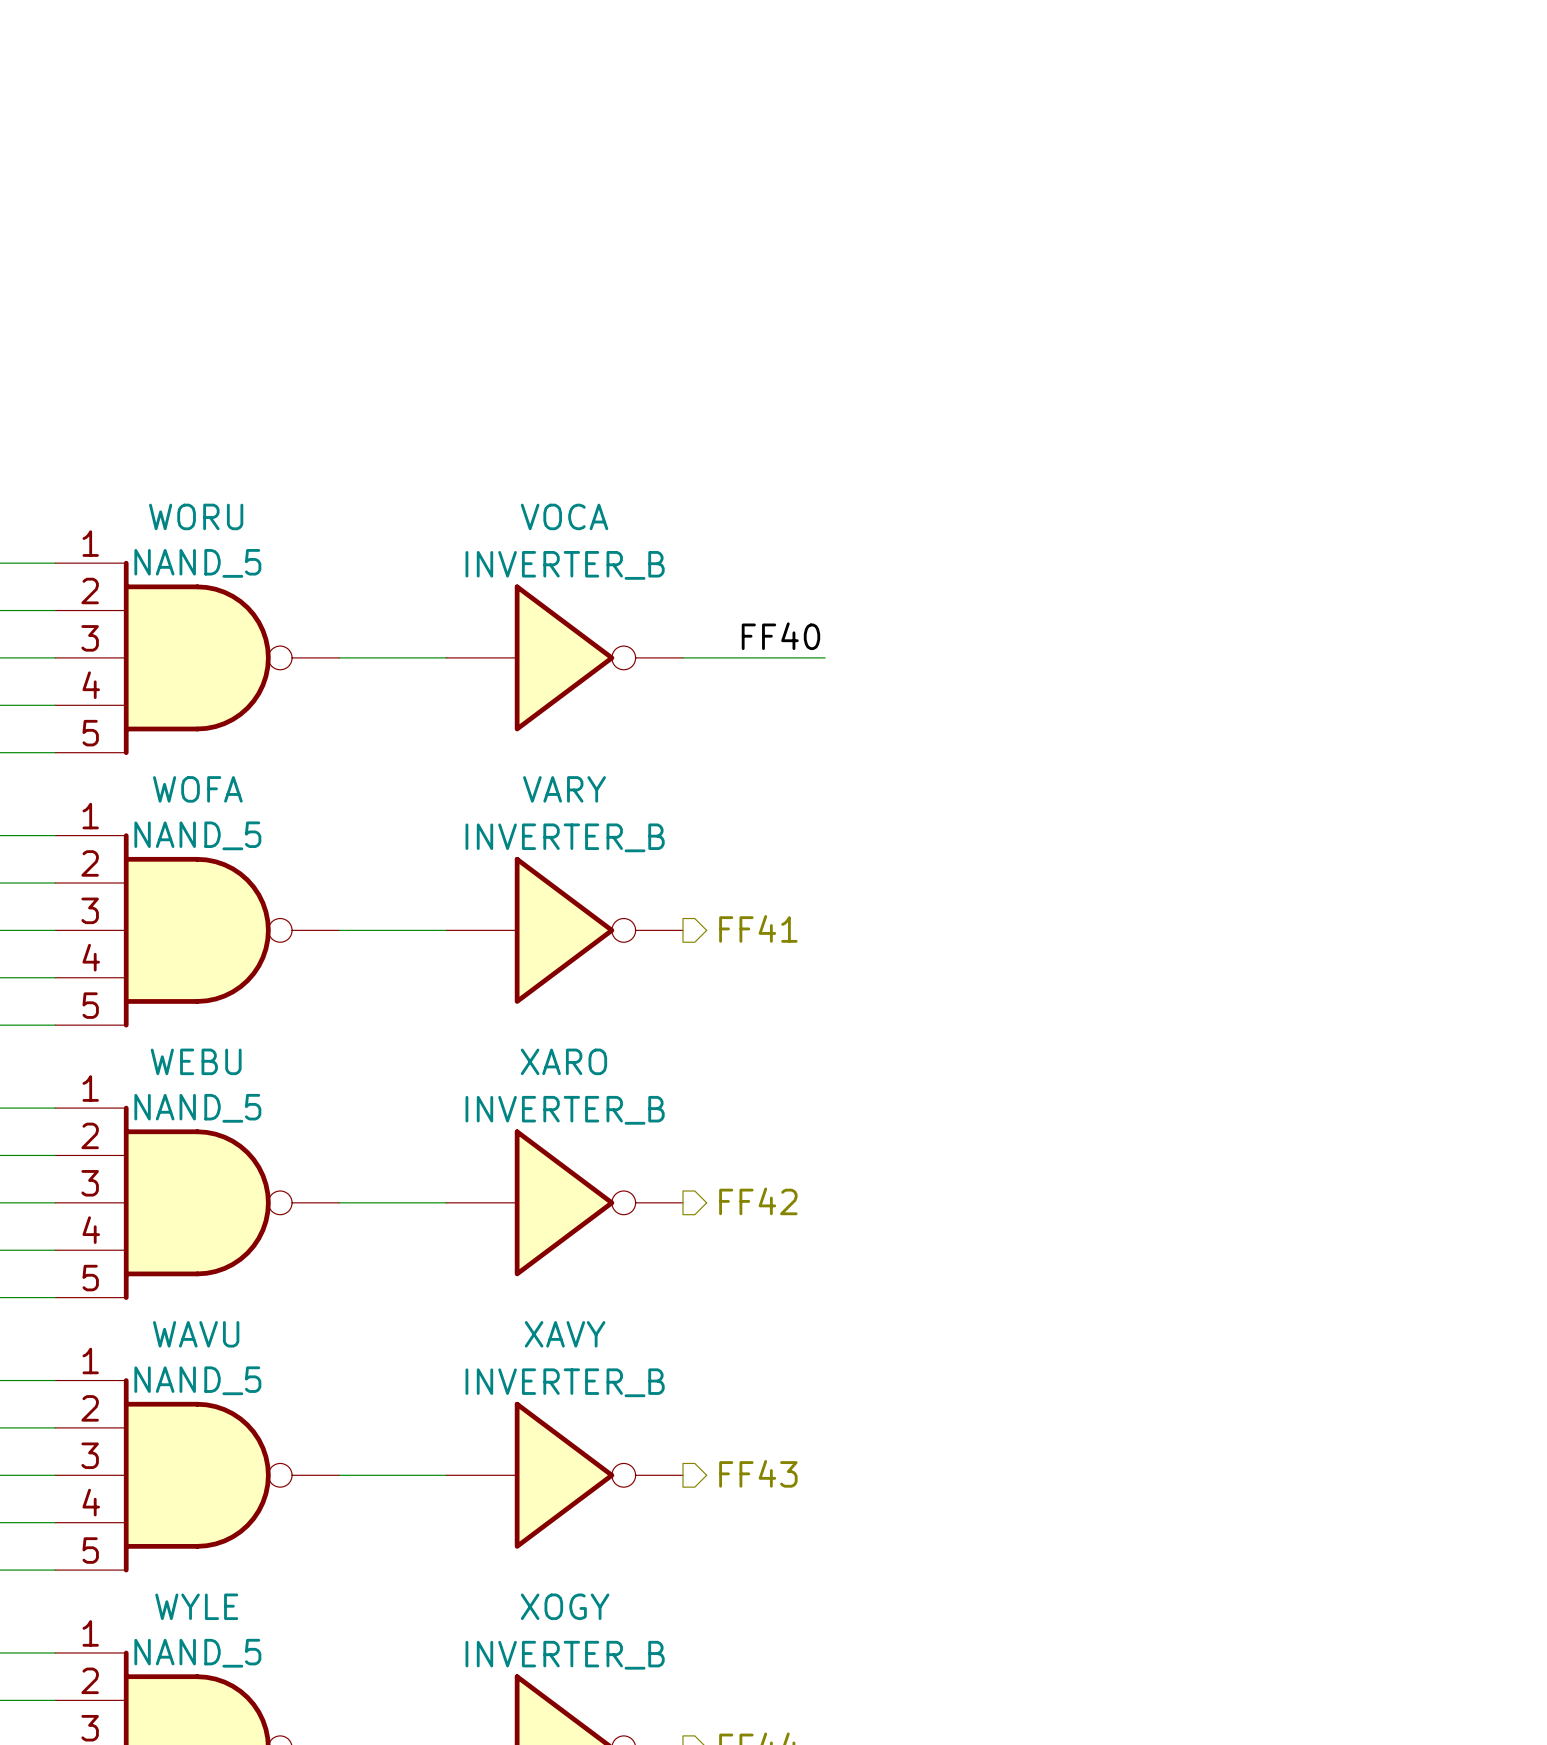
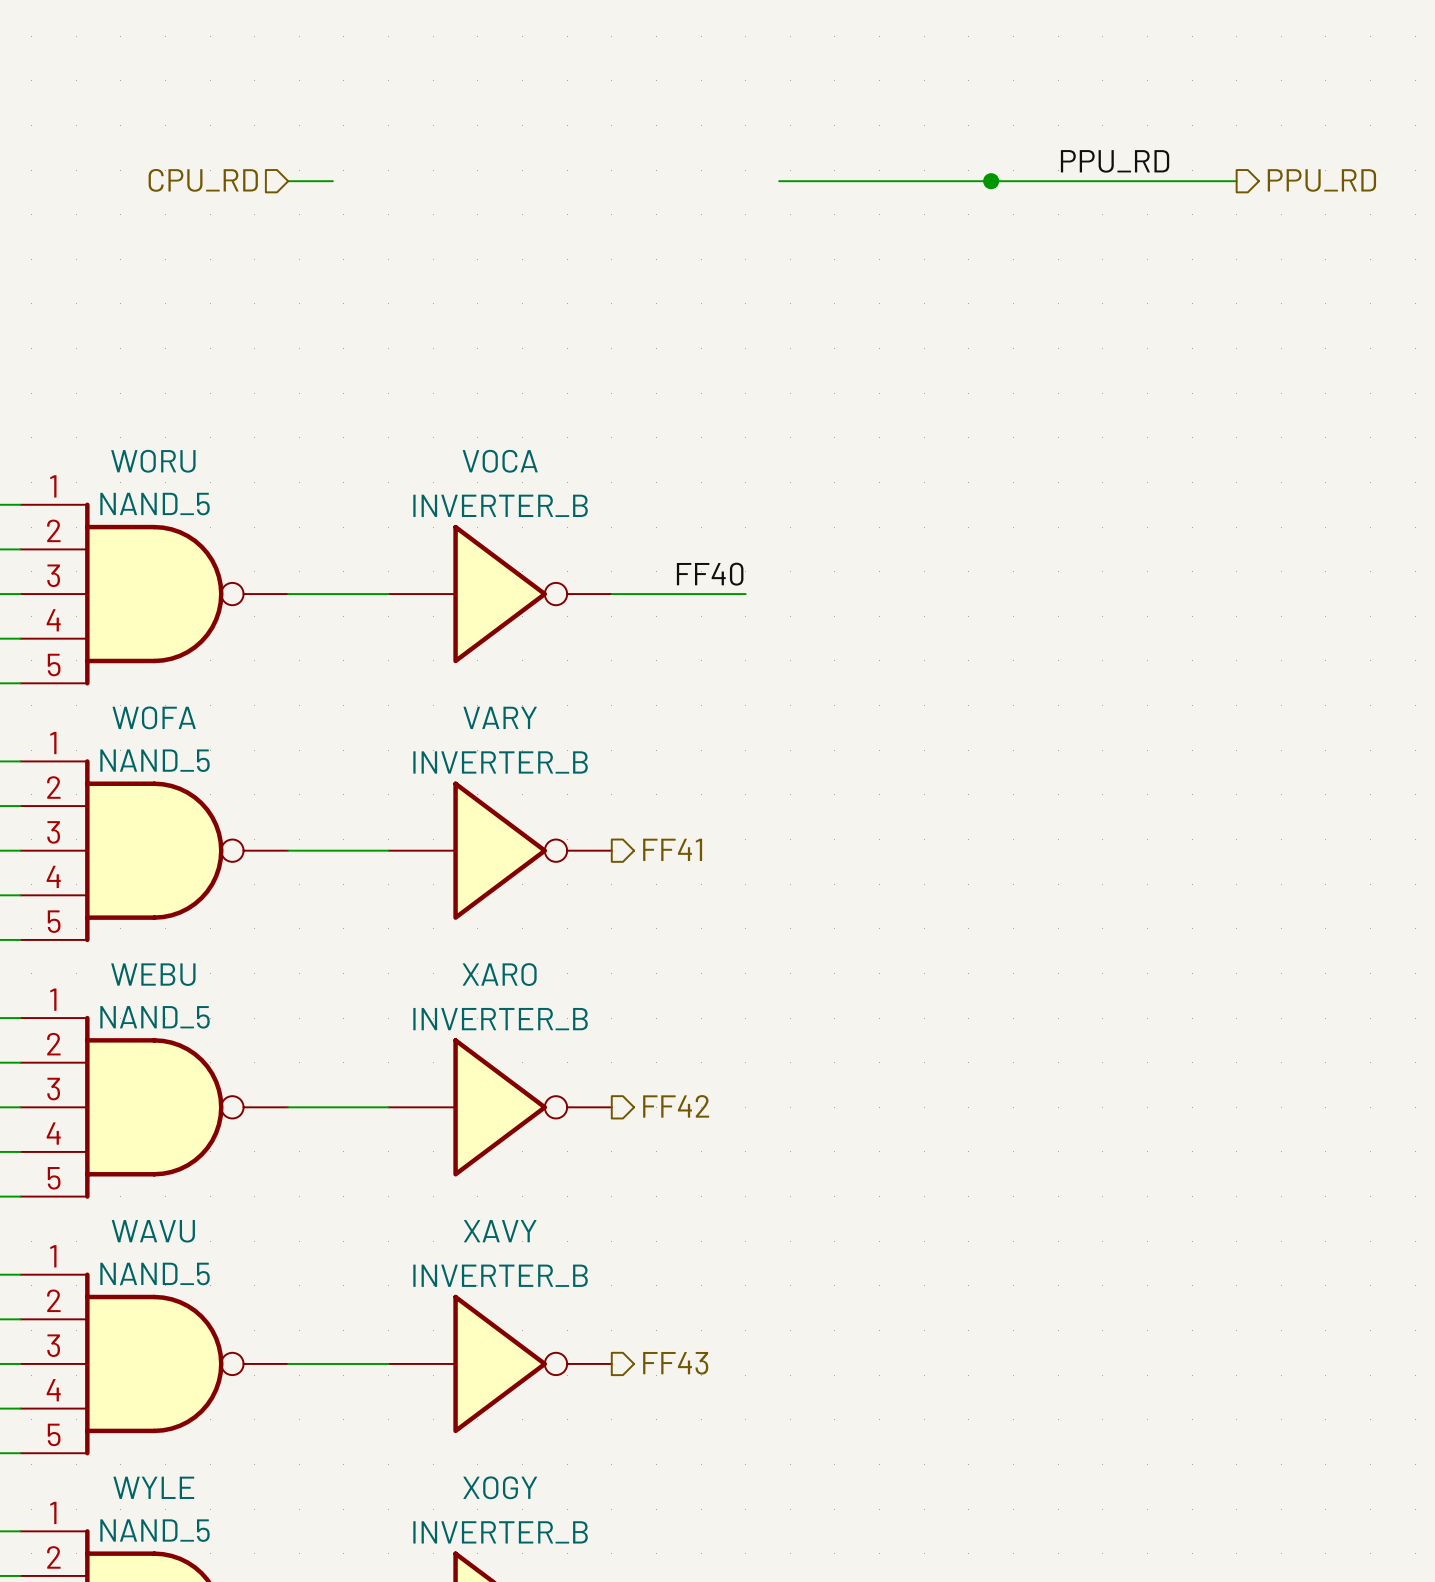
label: none -> PPU_RD (1115, 161)
hierarchical label: none -> CPU_RD (203, 180)
wire: none -> (288, 181) (332, 181)
wire: none -> (779, 181) (1236, 181)
junction: none -> (991, 181)
hierarchical label: none -> PPU_RD (1321, 180)

